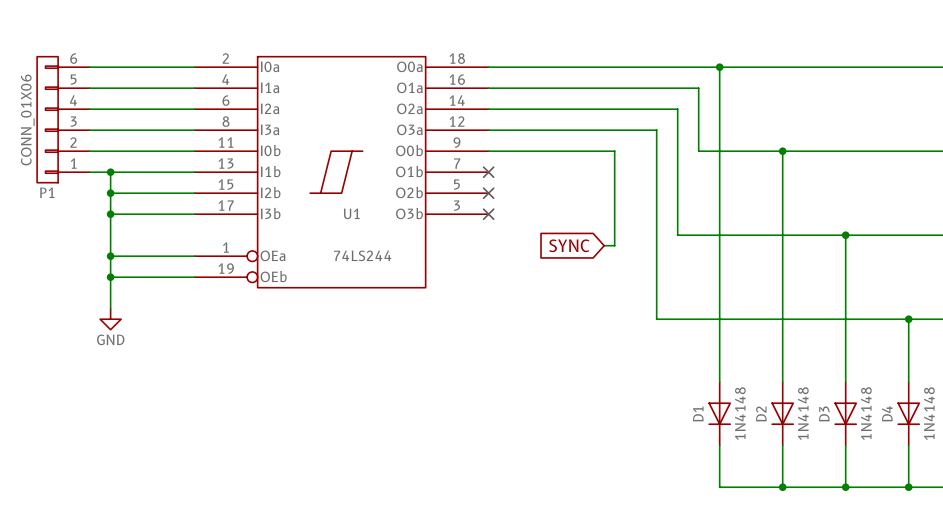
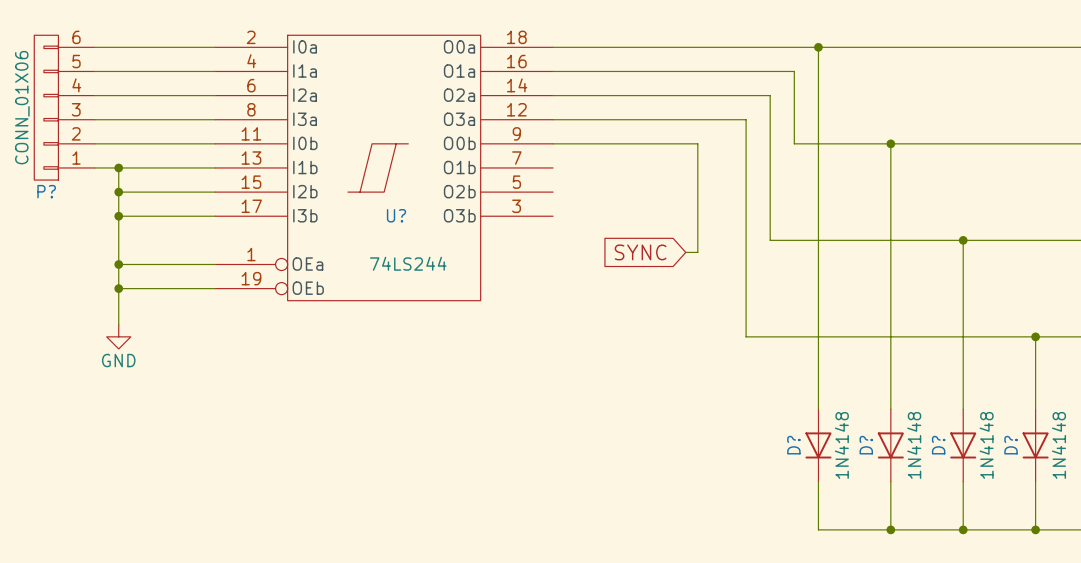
no-connect mark: (488, 172) -> none
P1 name: P1 (47, 192) -> P? (46, 191)
no-connect mark: (488, 193) -> none
U1 name: U1 (351, 213) -> U? (396, 215)
no-connect mark: (488, 214) -> none
D2 name: D2 (761, 413) -> D? (866, 445)
D3 name: D3 (824, 413) -> D? (938, 445)
D4 name: D4 (887, 413) -> D? (1011, 445)
D1 name: D1 (698, 414) -> D? (793, 445)

